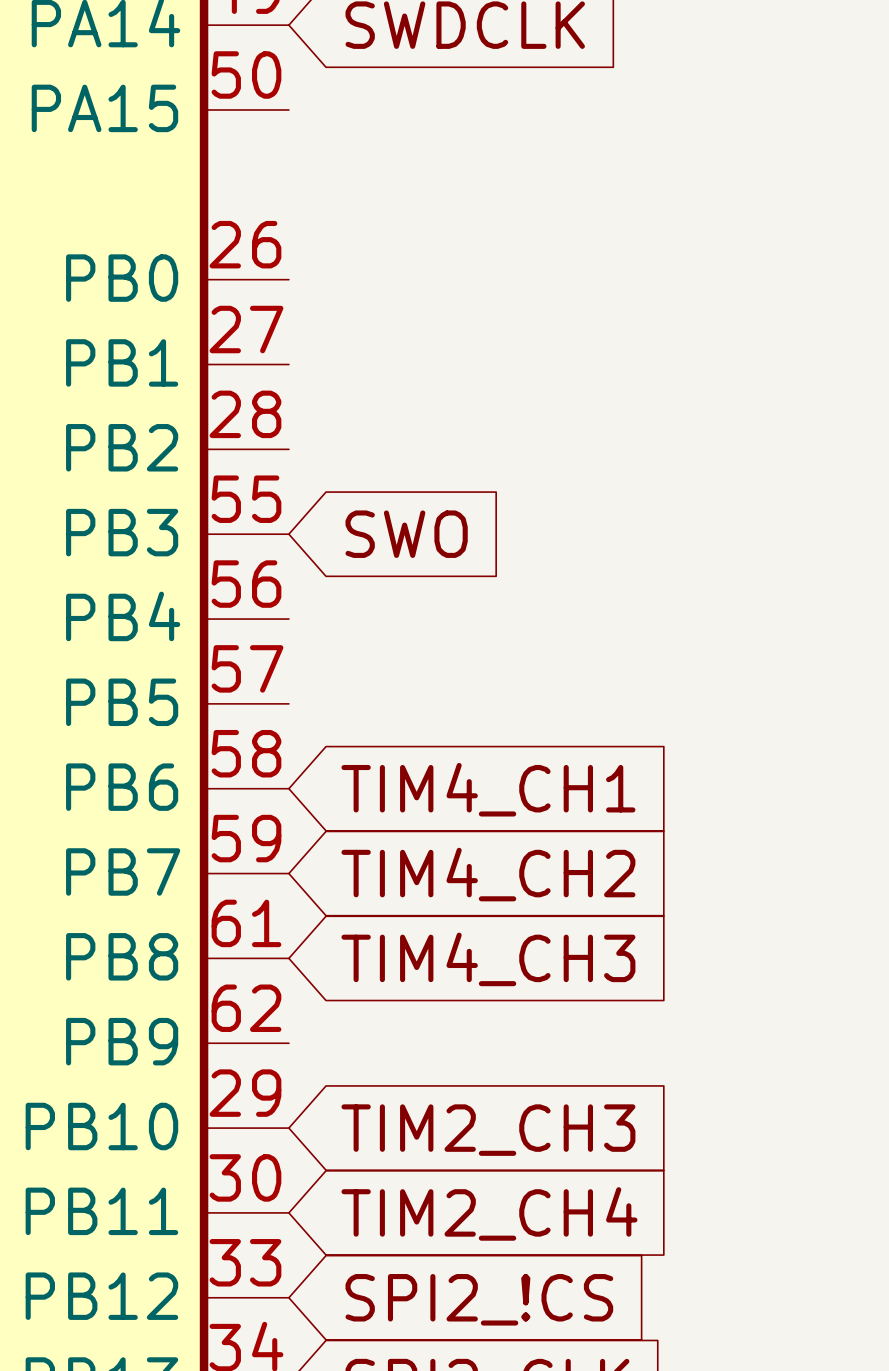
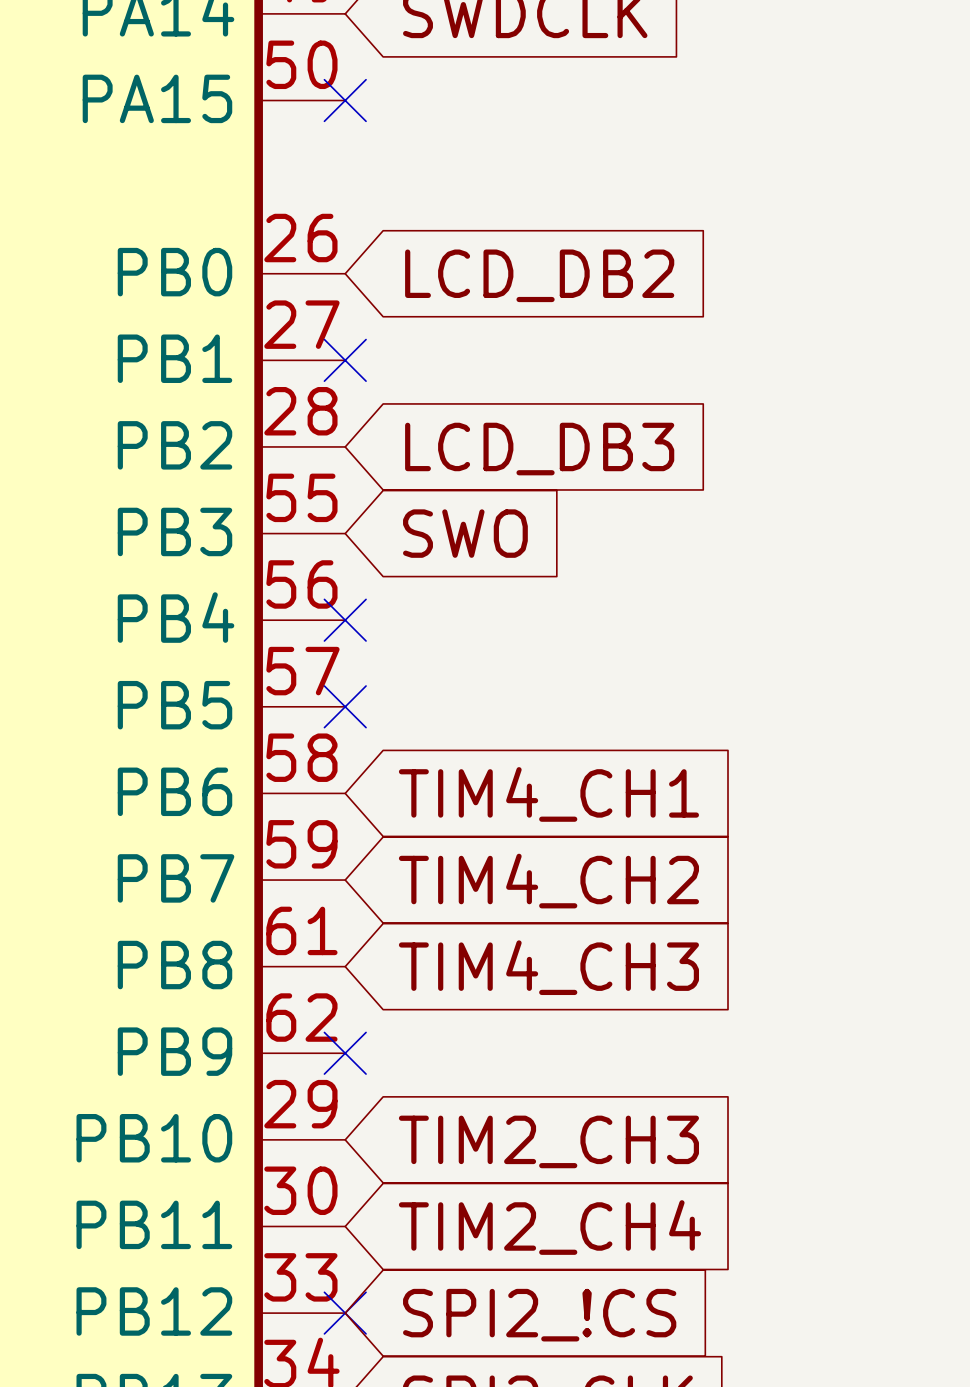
no-connect mark: none -> (345, 100)
global label: none -> LCD_DB2 (539, 275)
no-connect mark: none -> (345, 360)
global label: none -> LCD_DB3 (539, 449)
no-connect mark: none -> (345, 620)
no-connect mark: none -> (345, 706)
no-connect mark: none -> (345, 1053)
no-connect mark: none -> (345, 1313)

